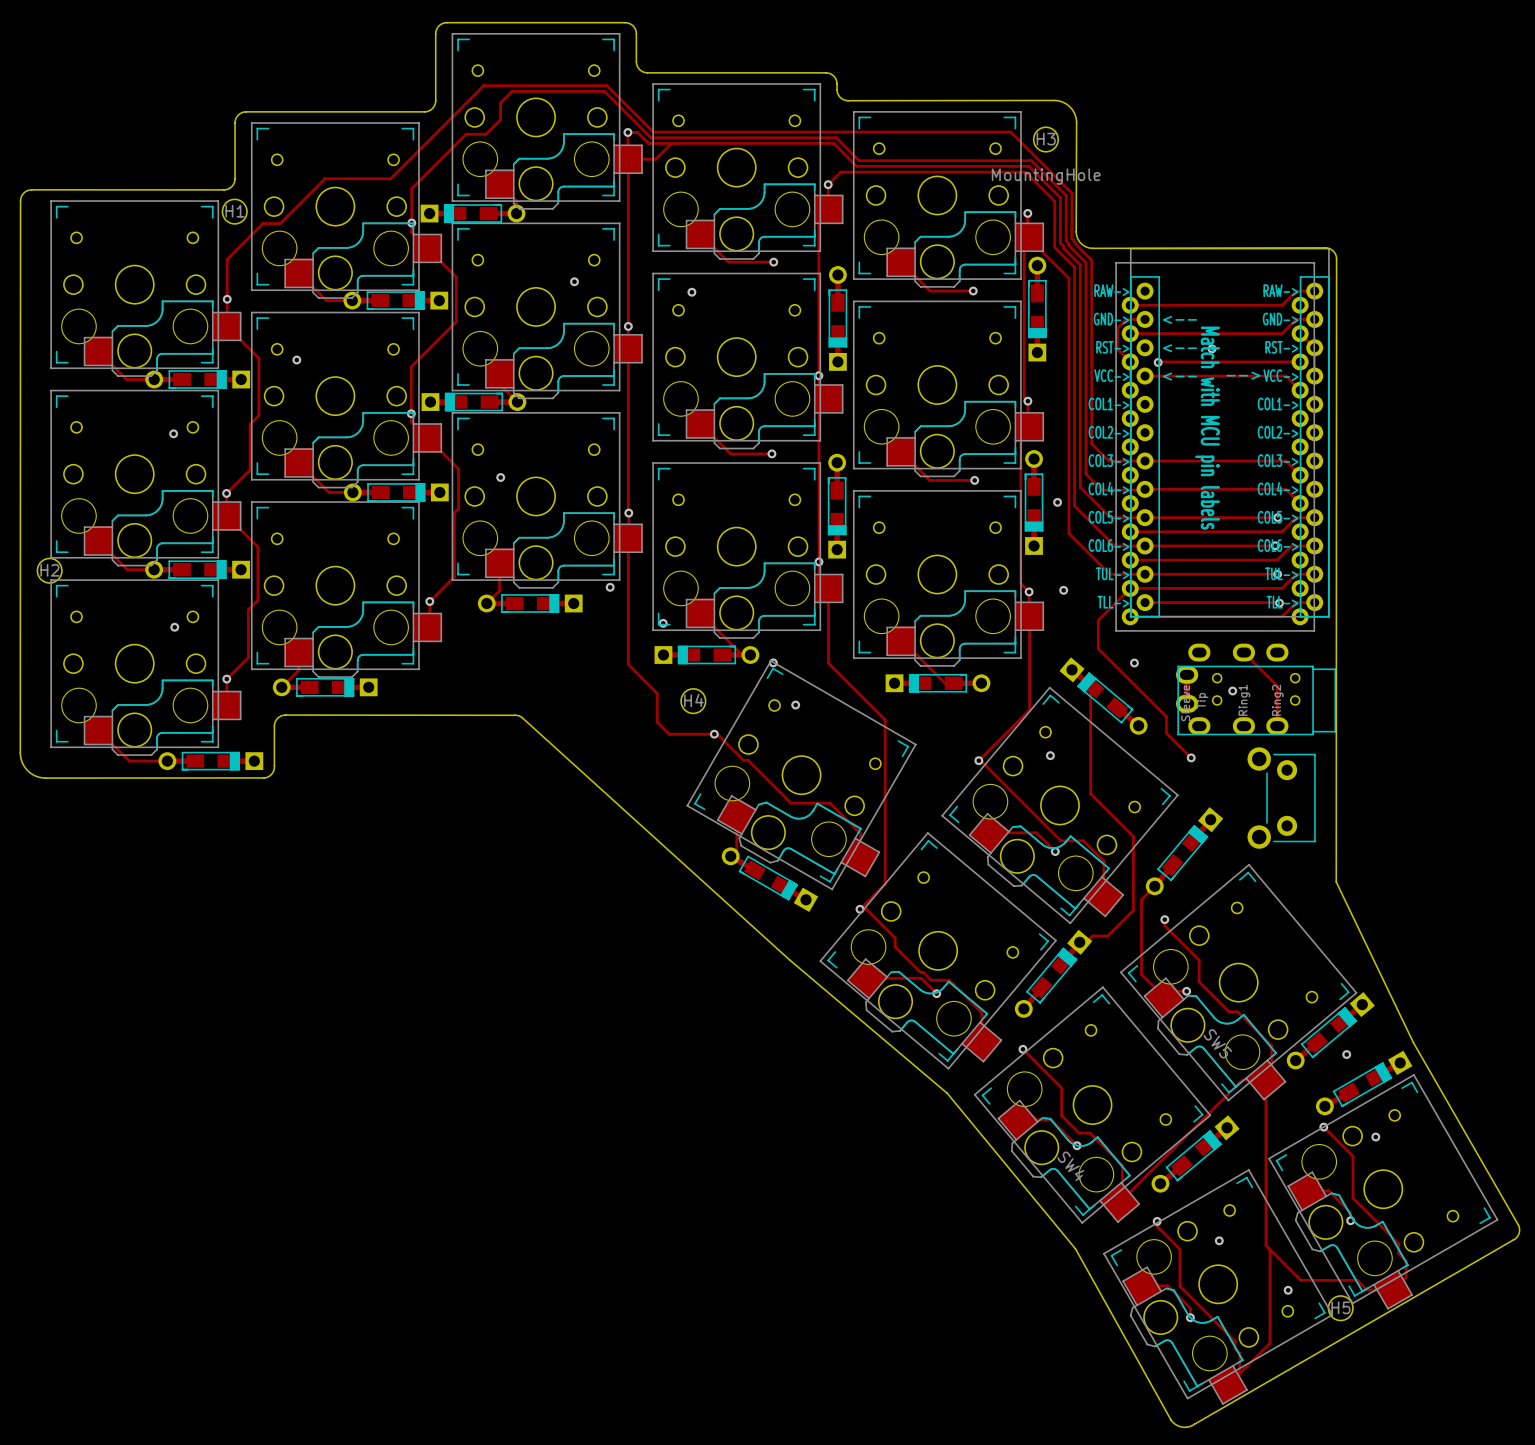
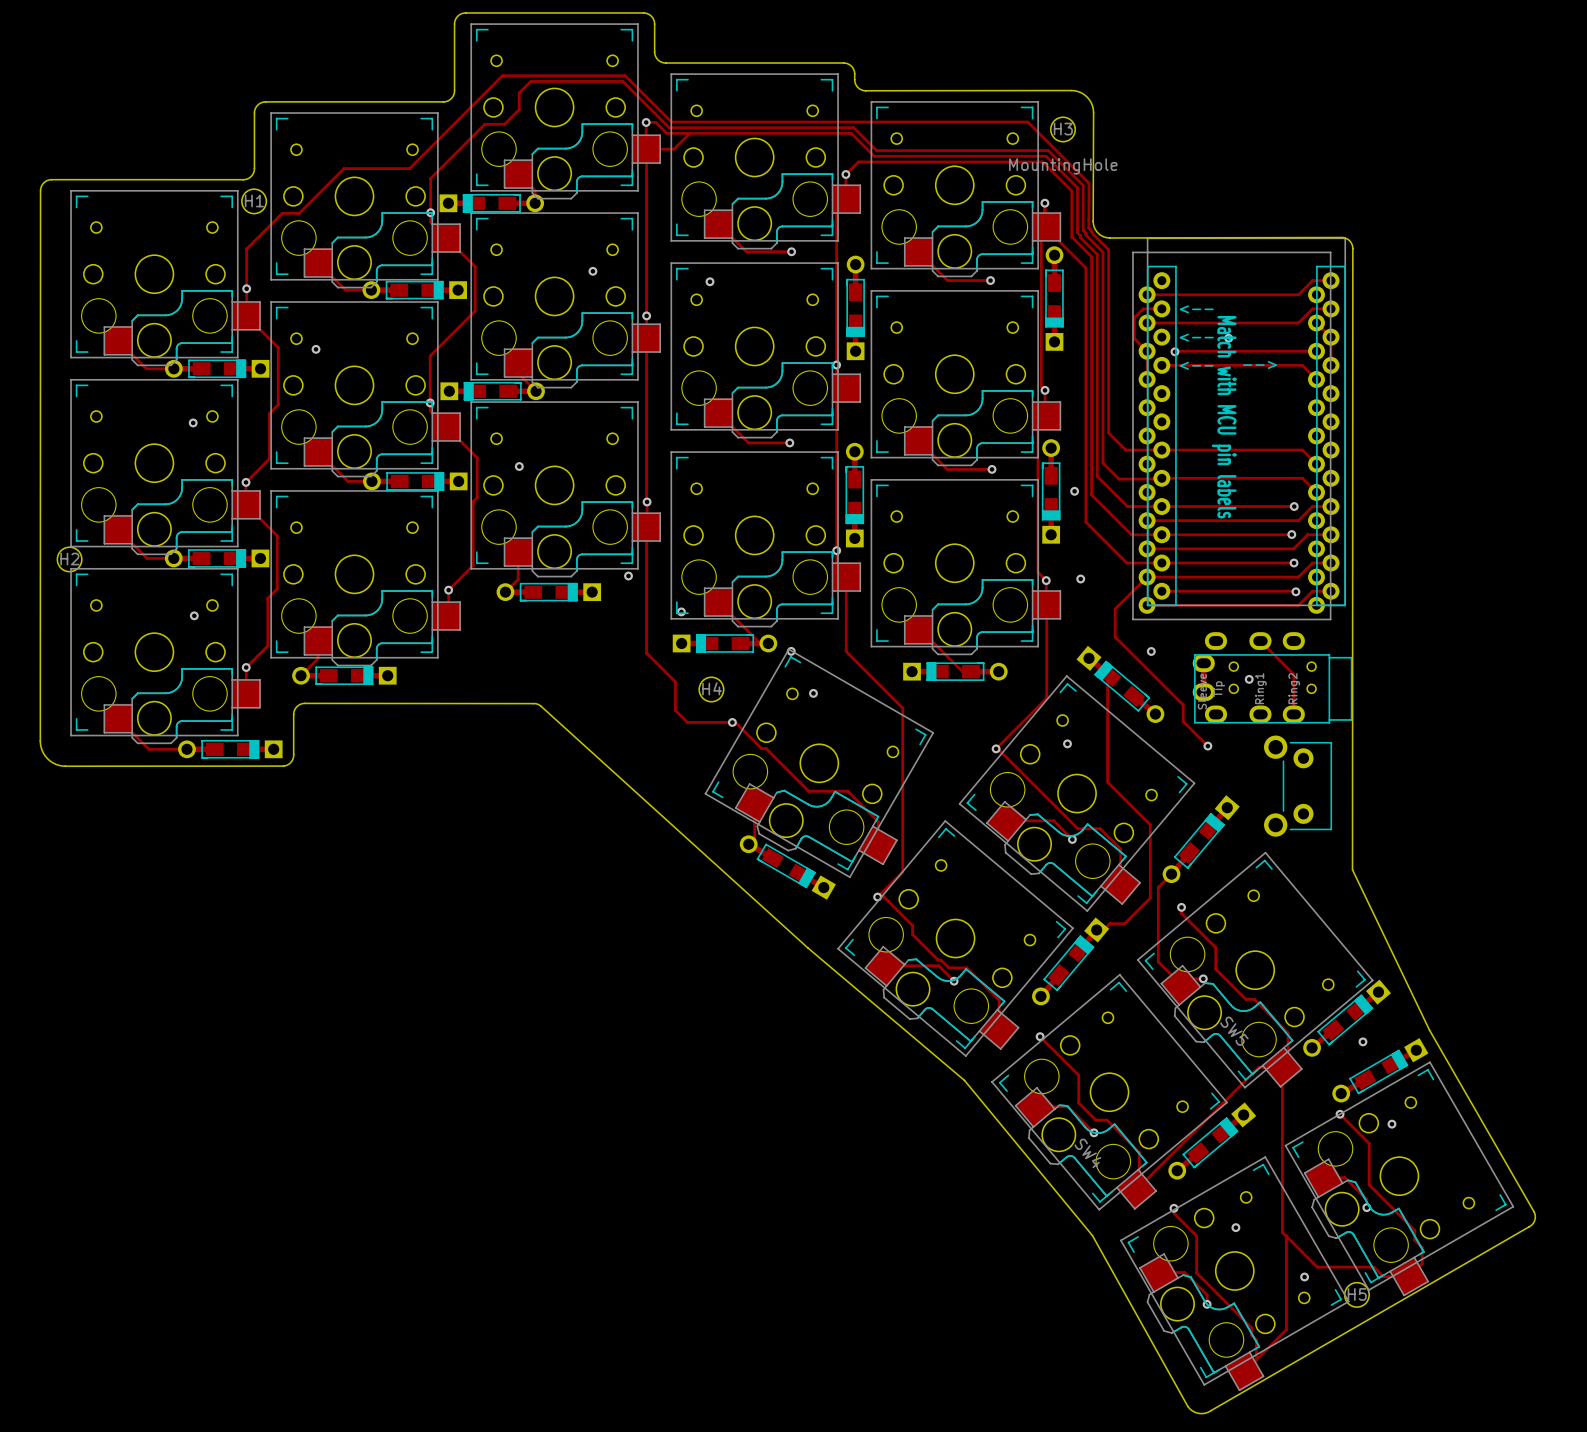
part footprint: [1115, 247, 1330, 632] -> [1132, 237, 1347, 621]

